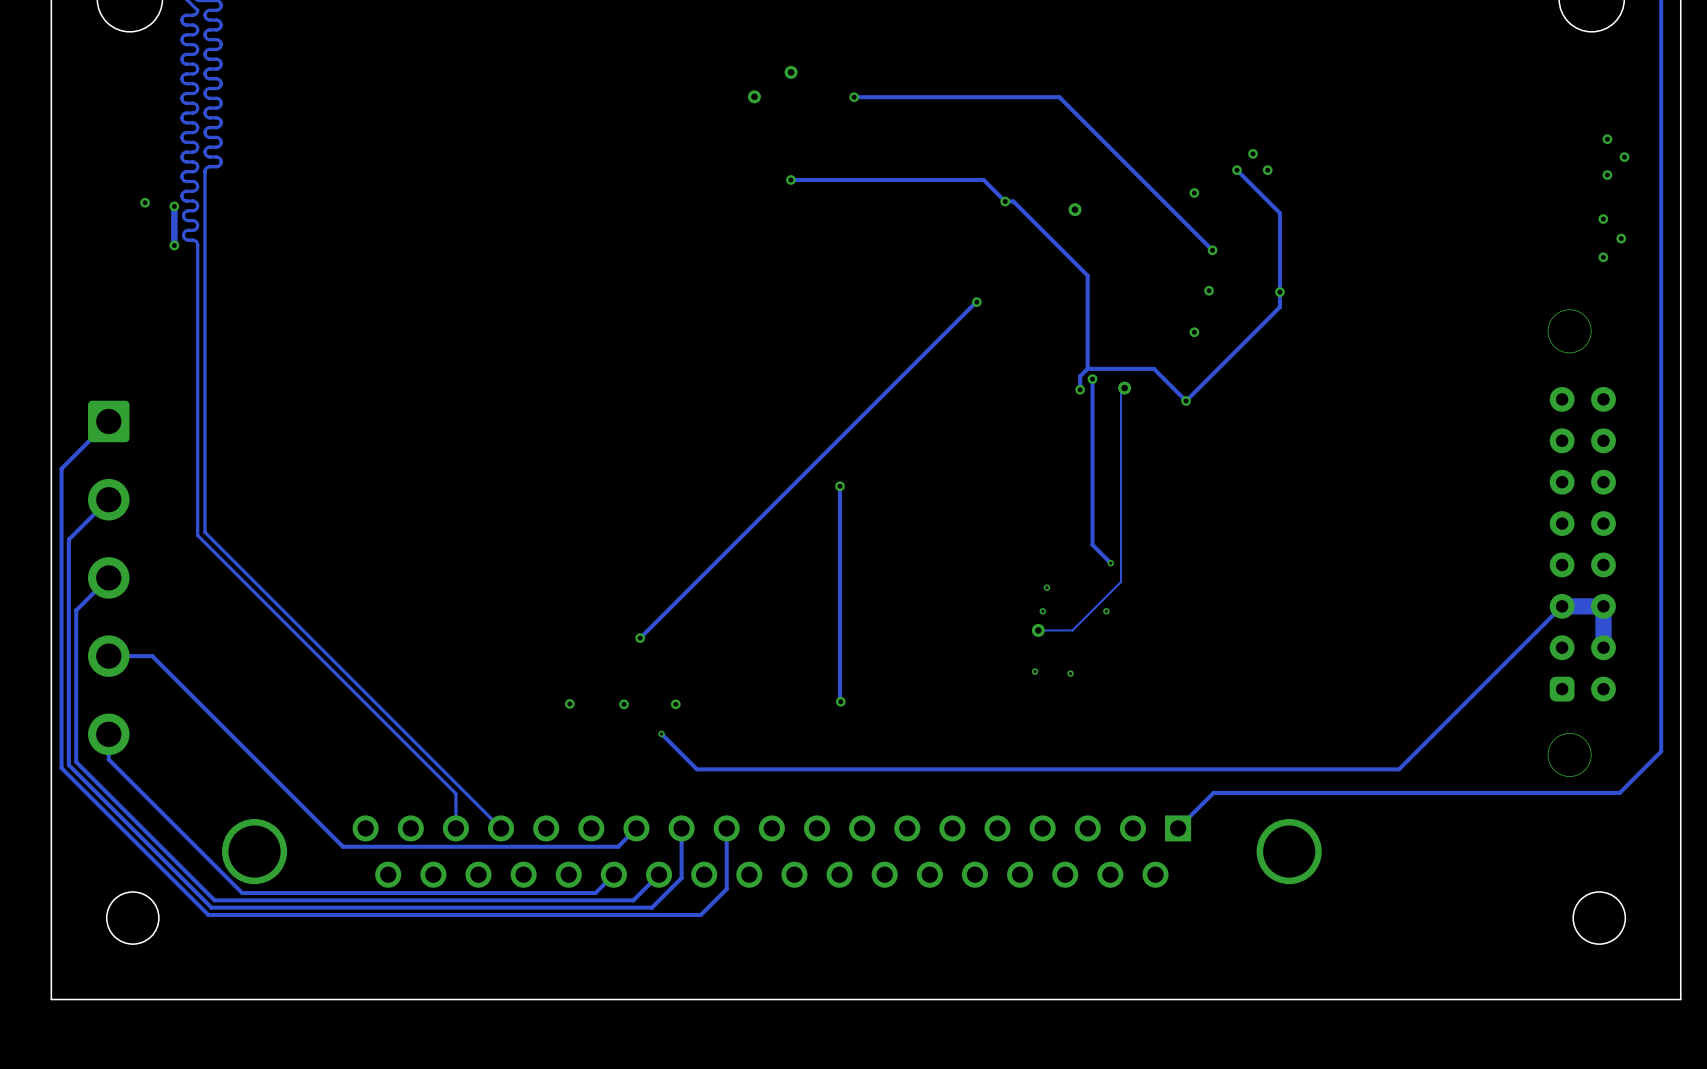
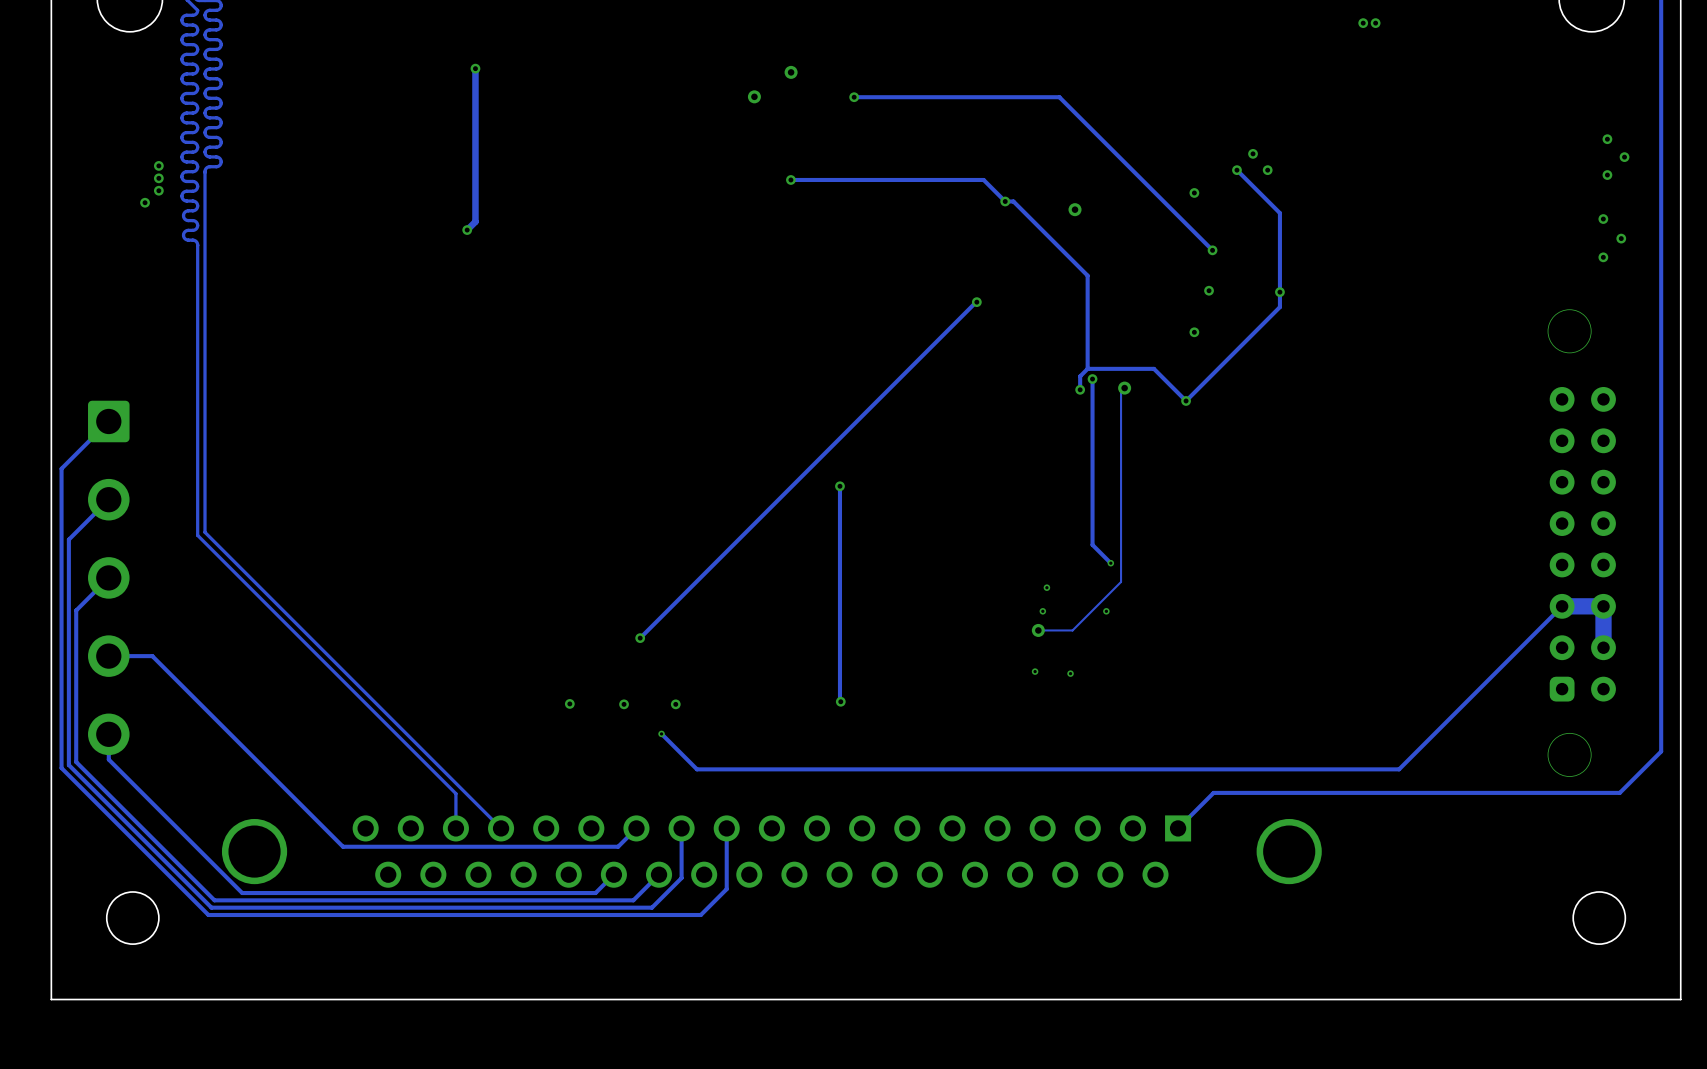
via: none -> (1363, 23)
via: none -> (1375, 23)
track: none -> (475, 68) (475, 221) (467, 230)
via: none -> (475, 68)
via: none -> (158, 165)
via: none -> (158, 178)
via: none -> (158, 190)
track: (174, 206) (174, 245) -> none
via: (174, 206) -> none
via: none -> (467, 230)
via: (174, 245) -> none

